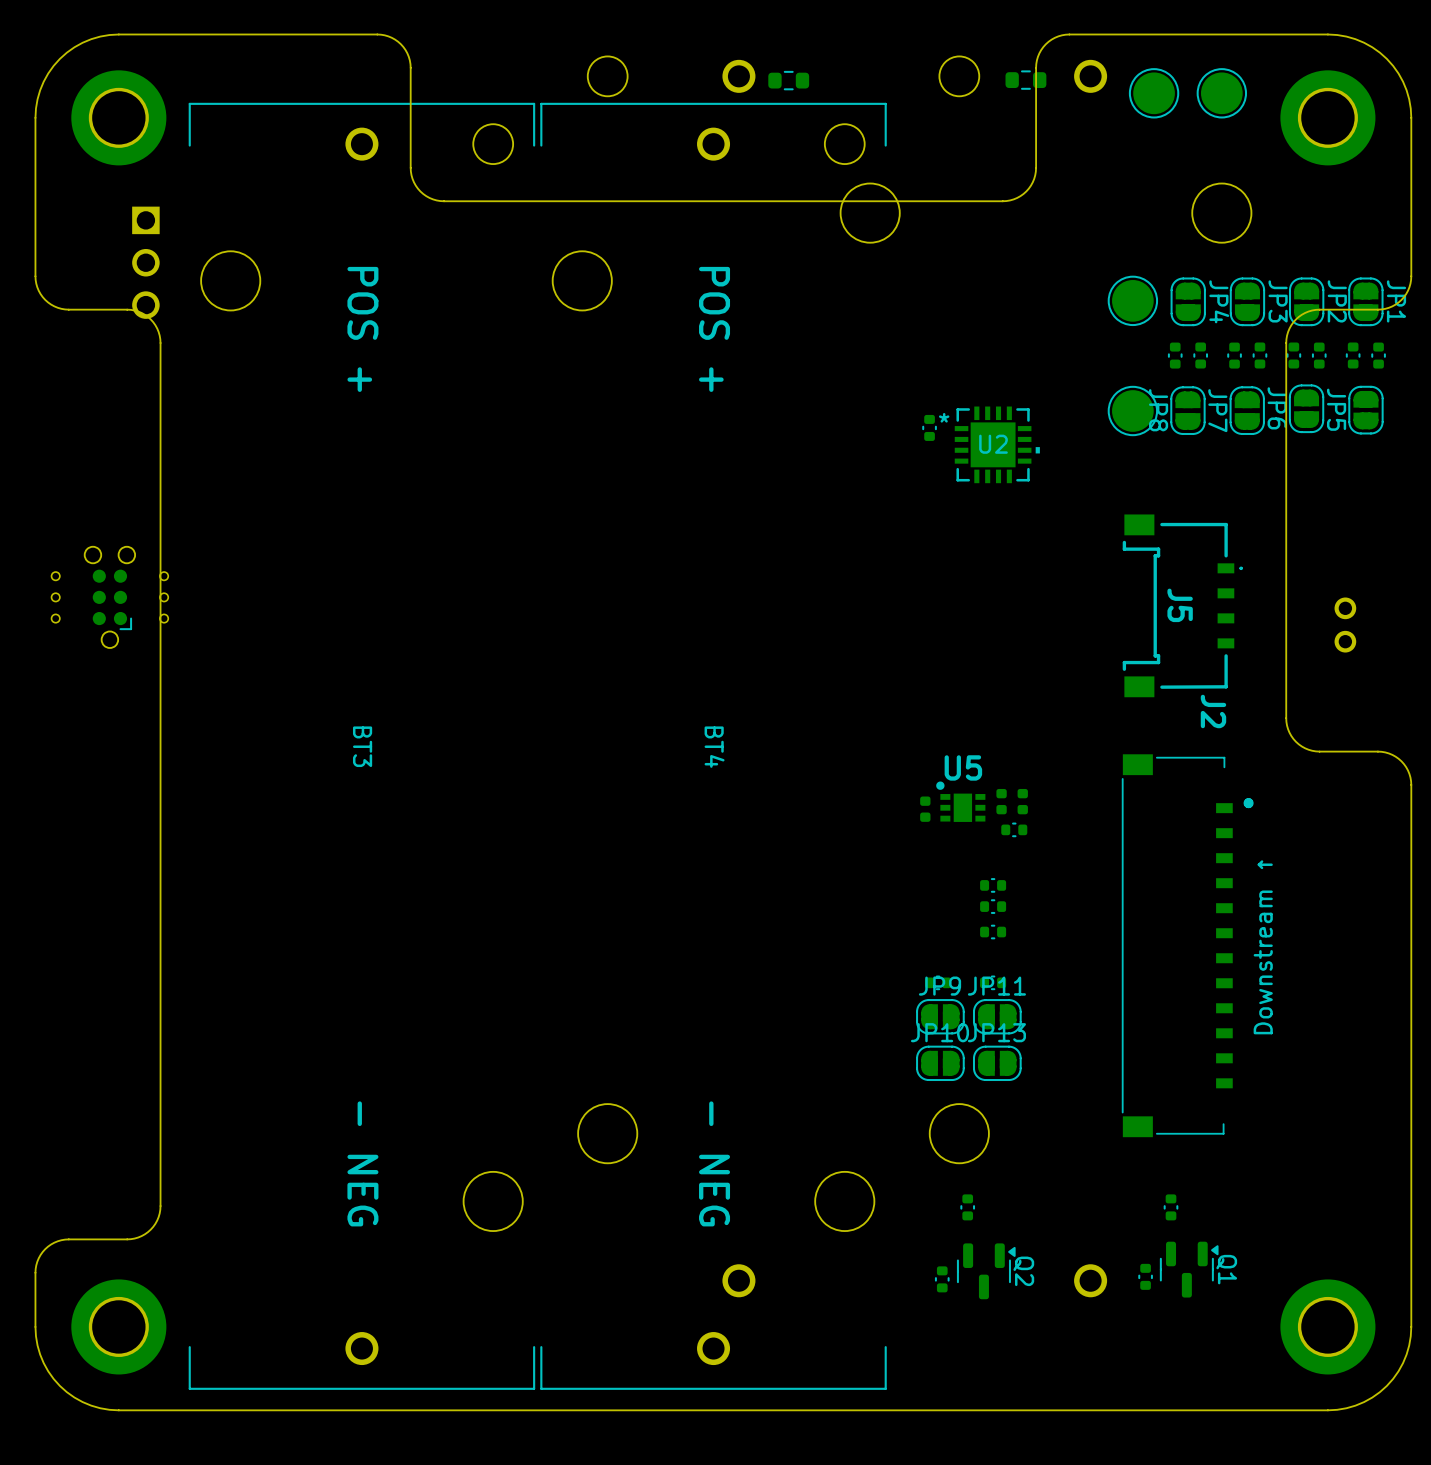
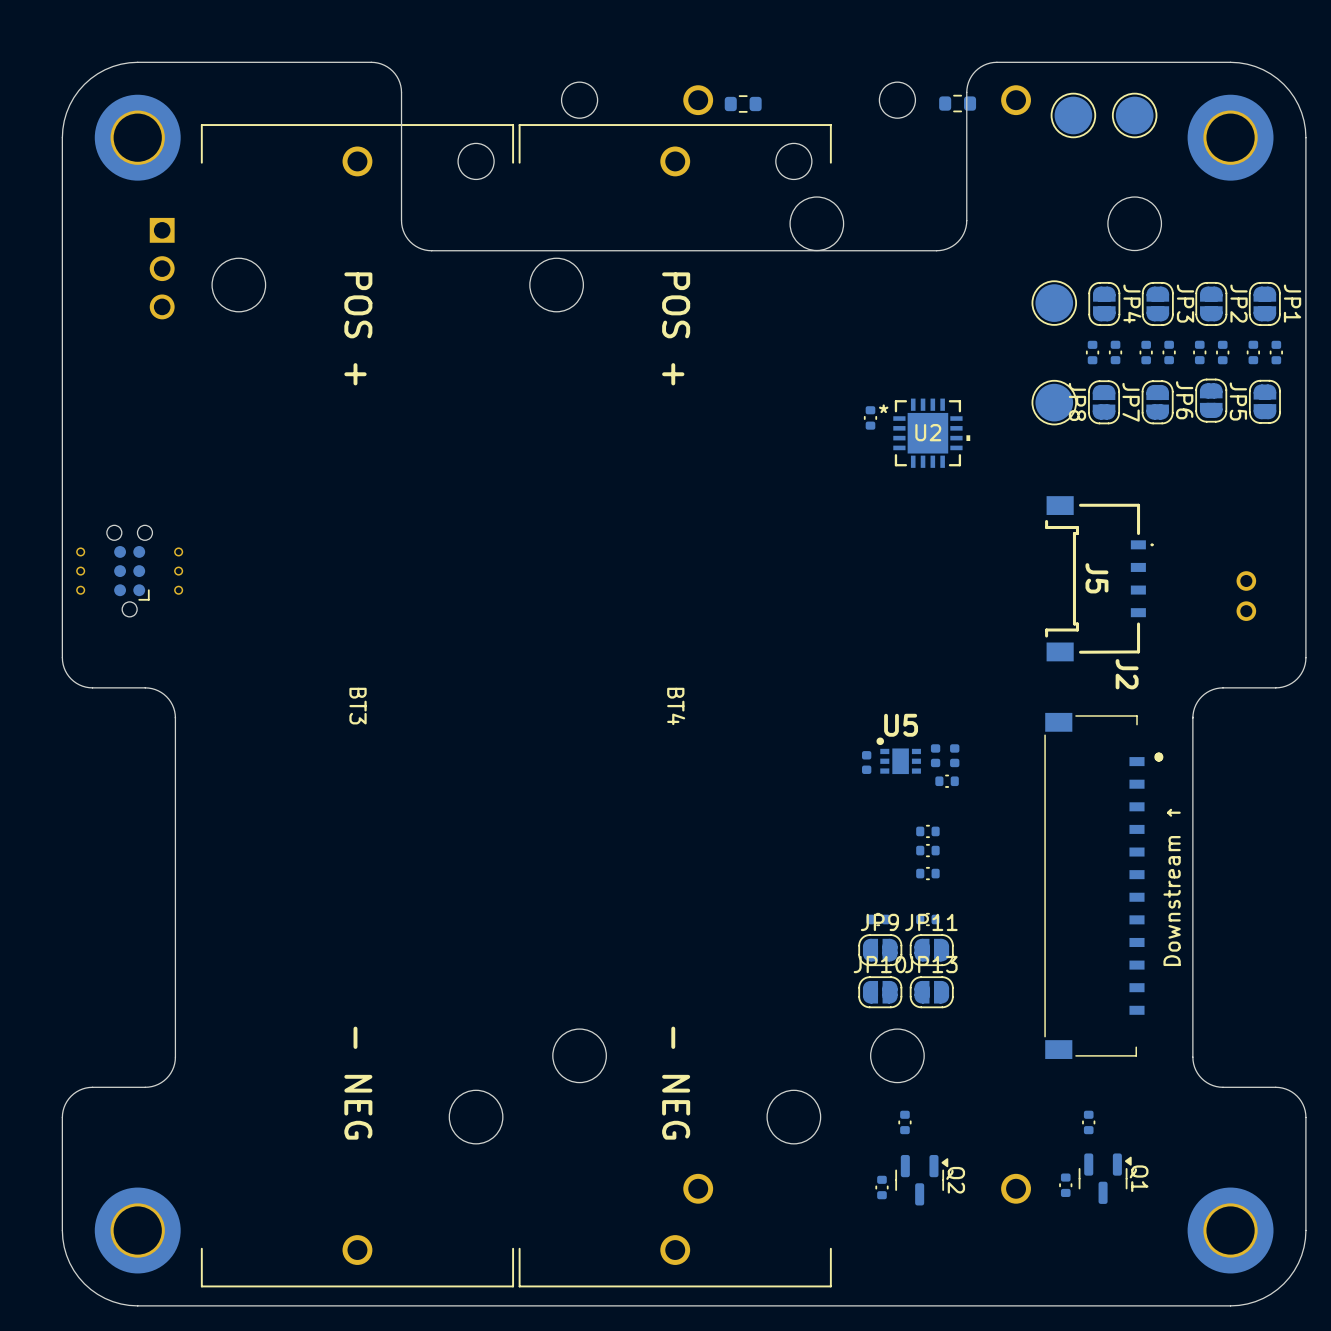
part footprint: [35, 34, 1412, 1411] -> [61, 61, 1307, 1307]

